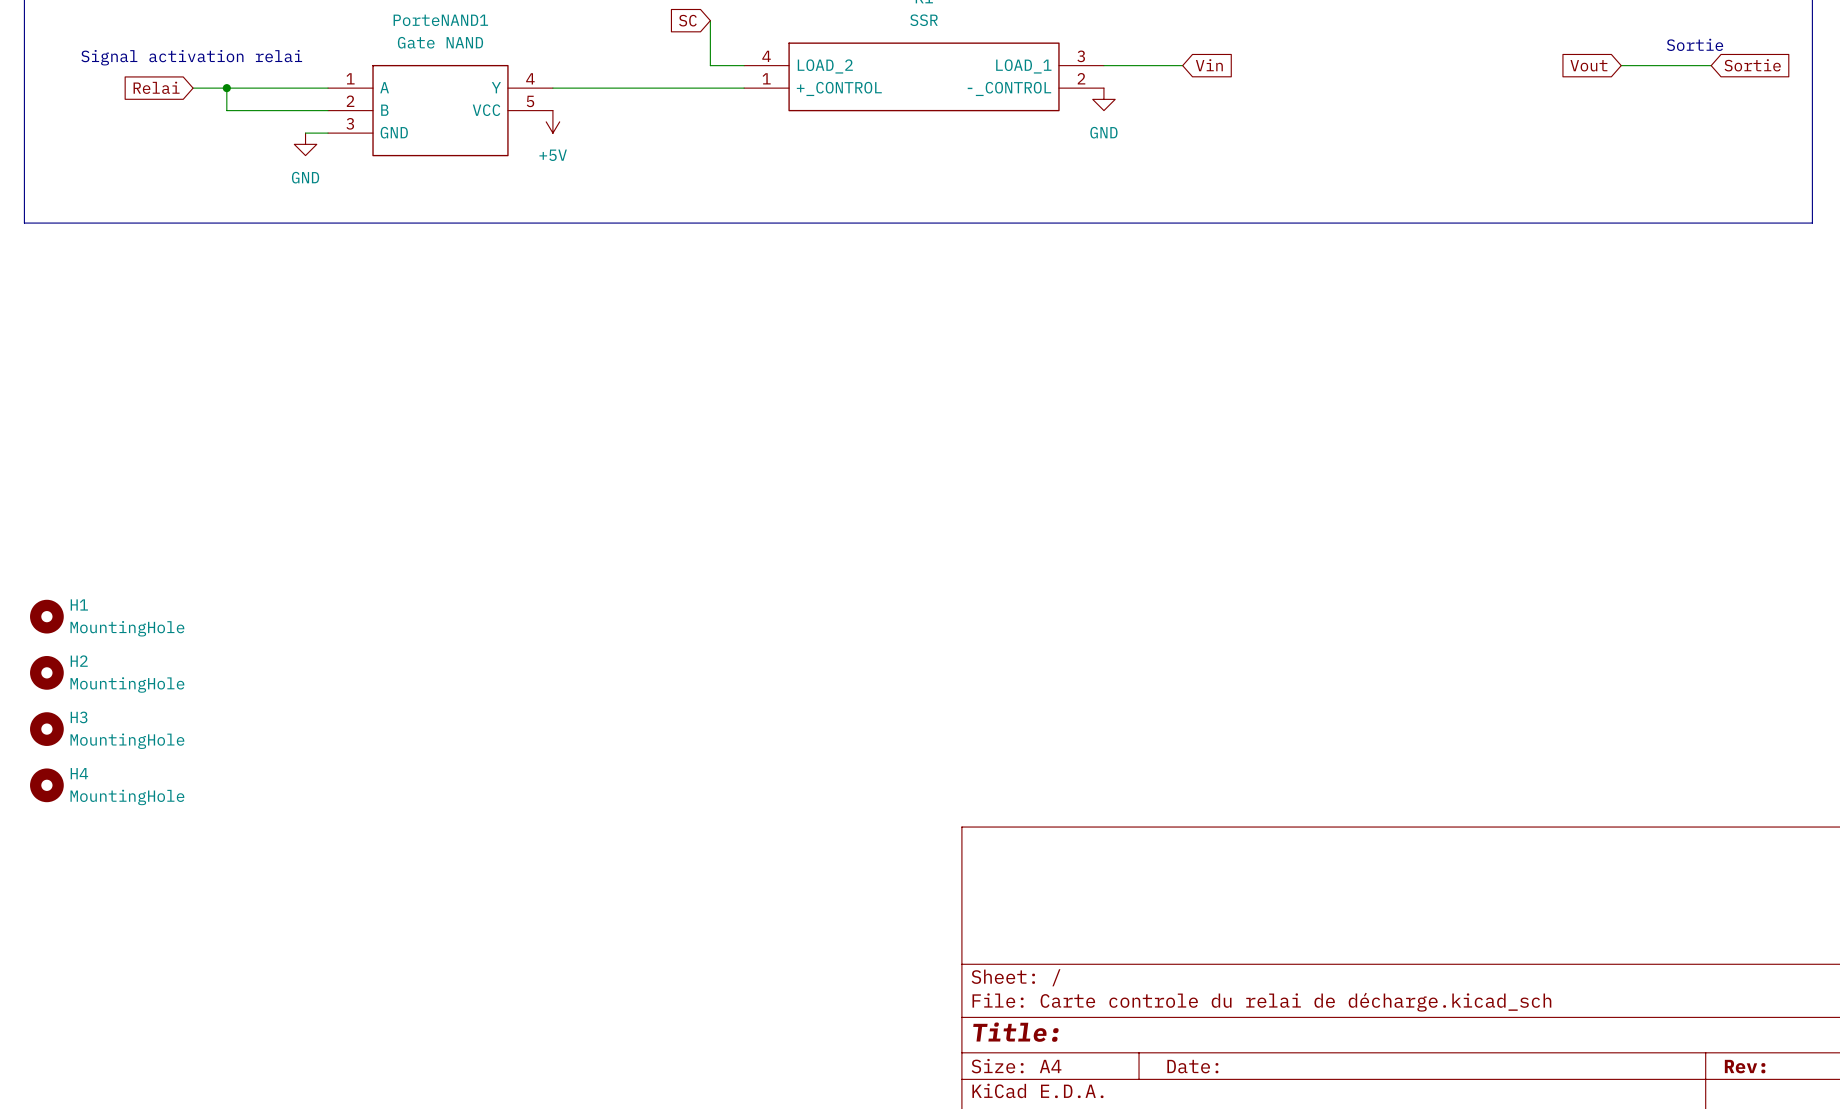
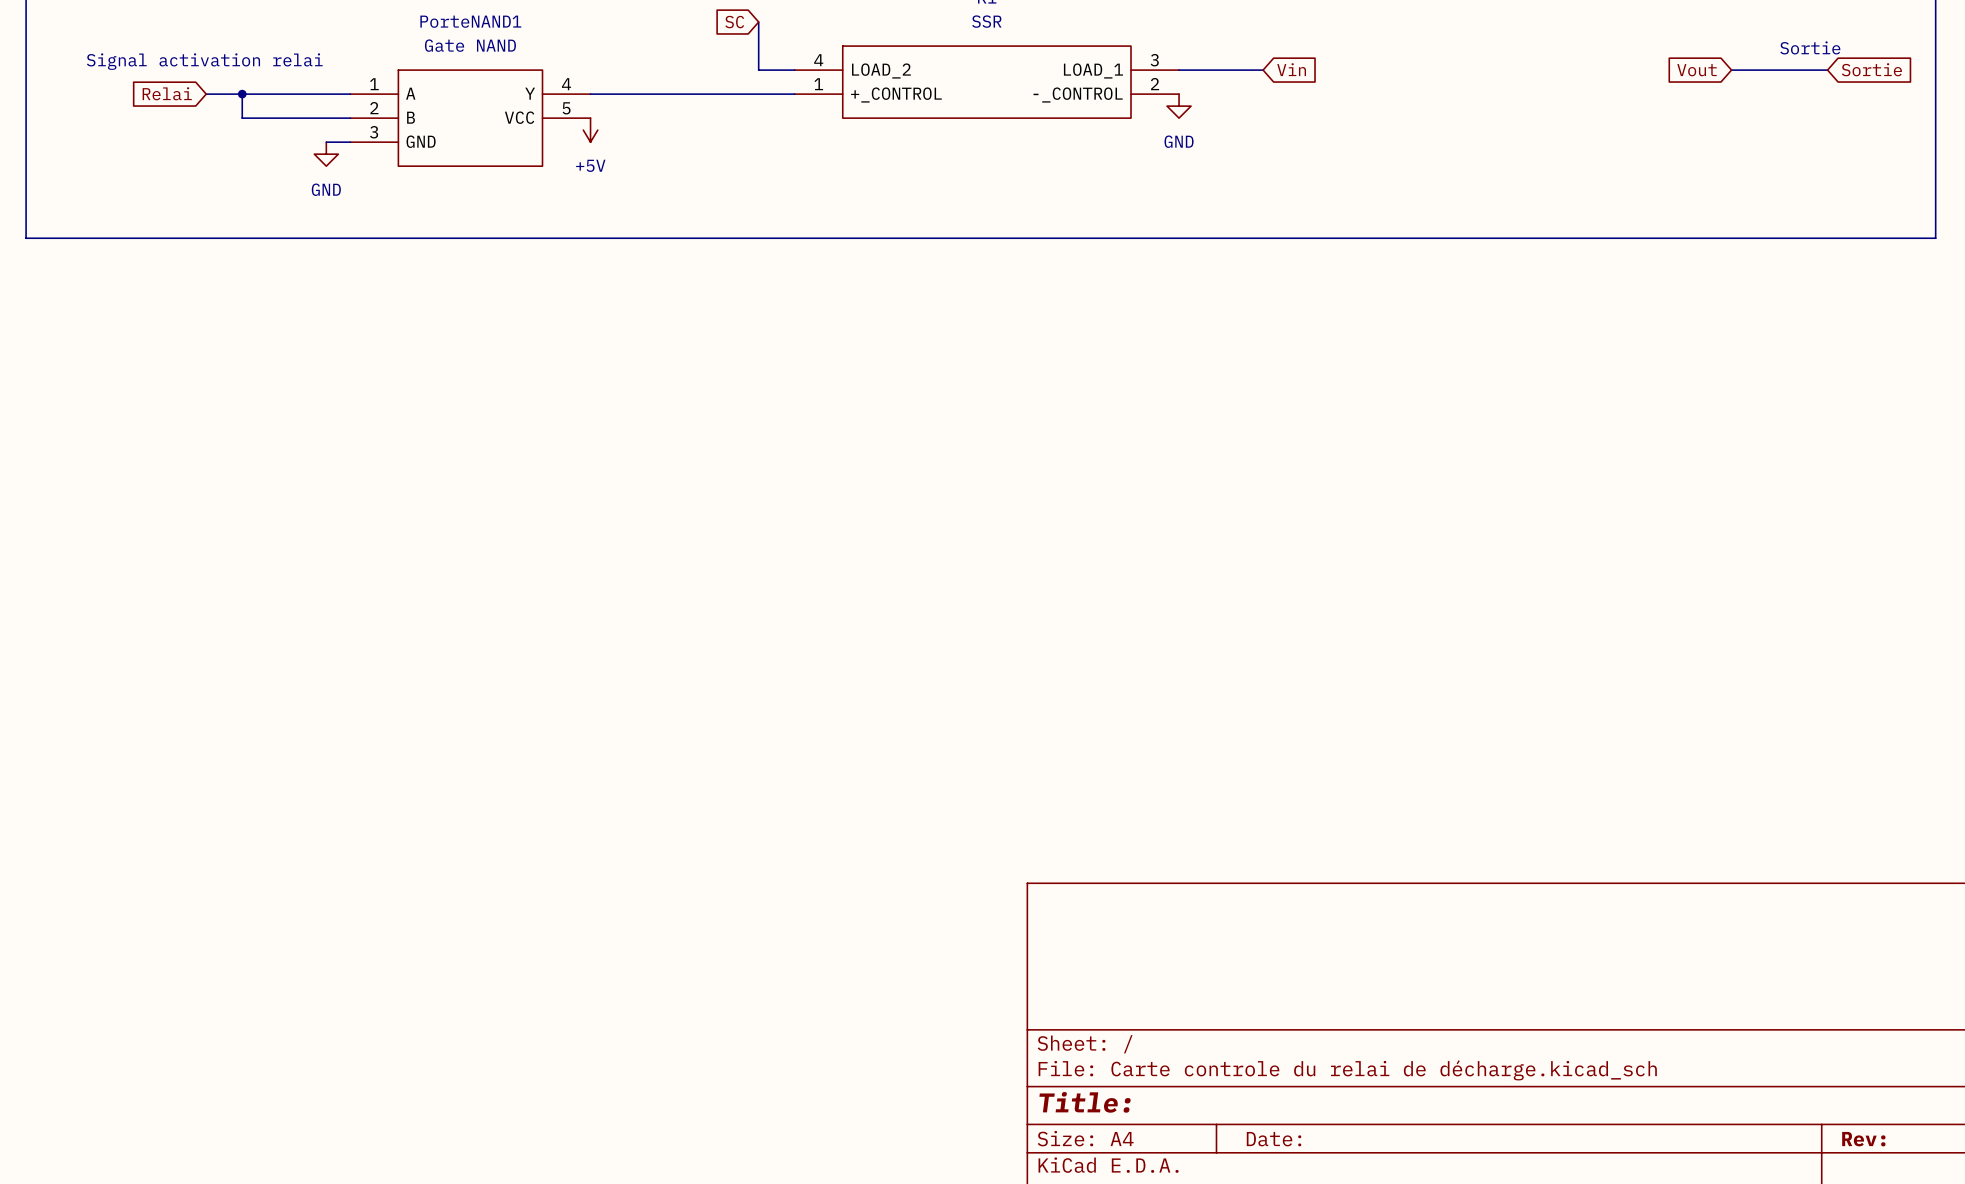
H1: MountingHole (46, 616) -> none
H2: MountingHole (46, 672) -> none
H3: MountingHole (46, 729) -> none
H4: MountingHole (46, 785) -> none

